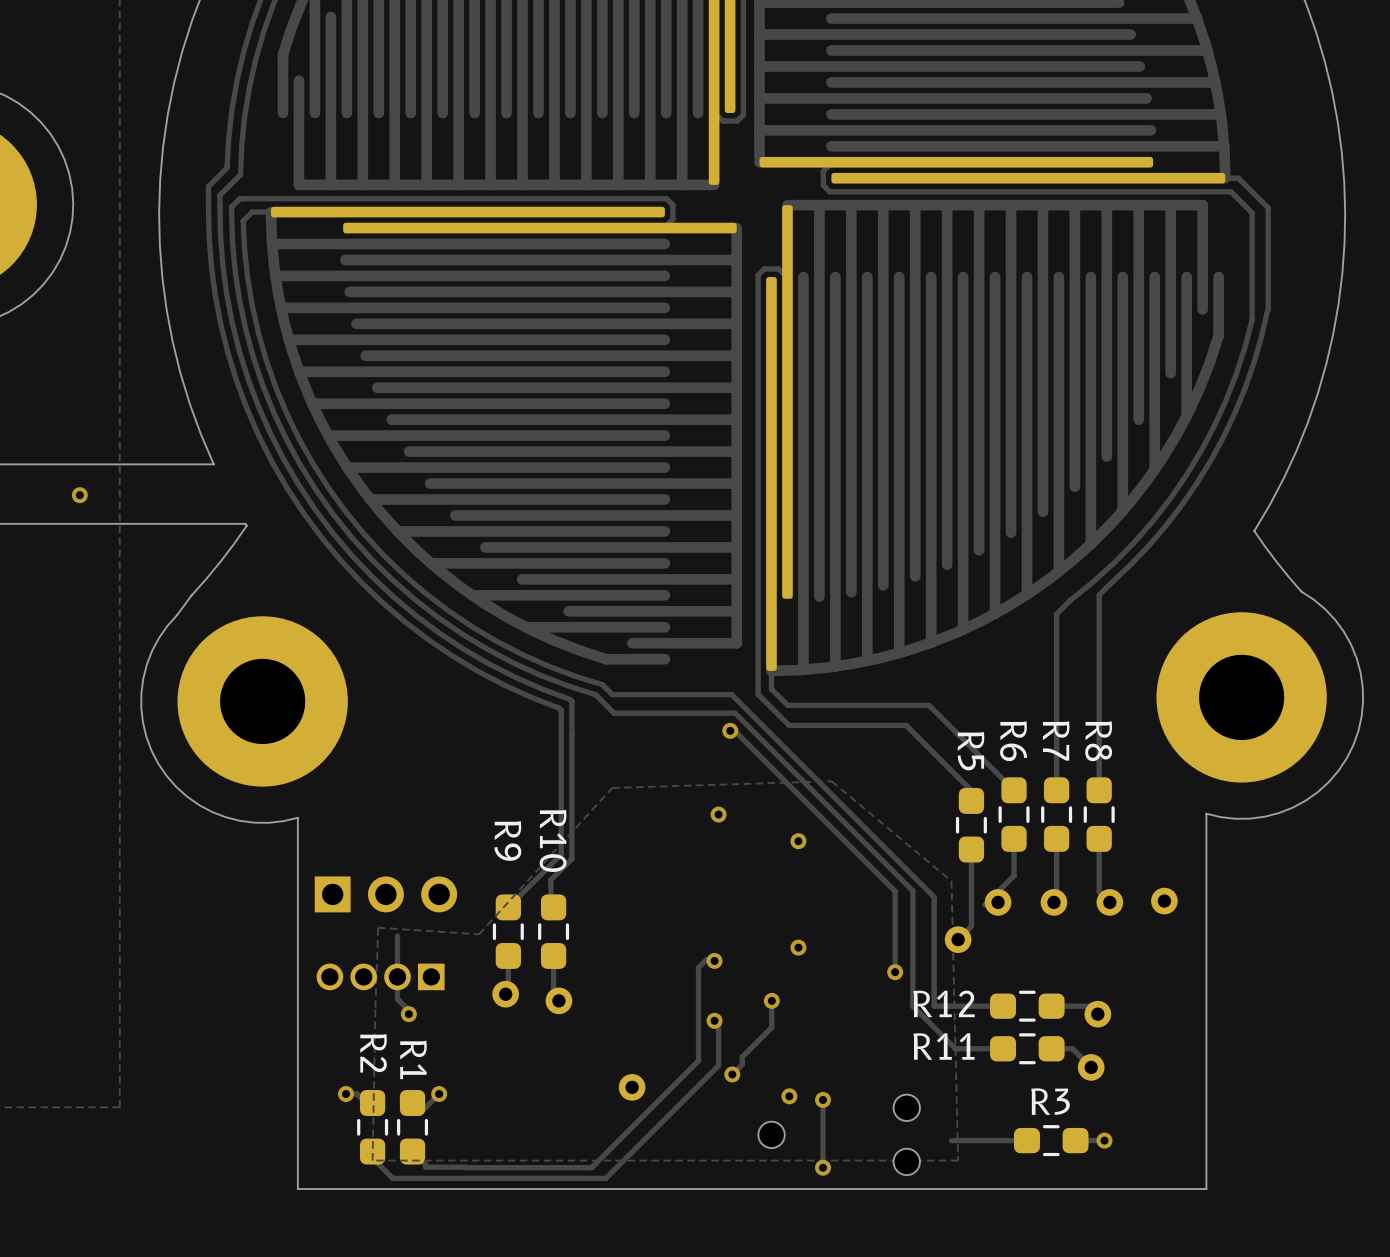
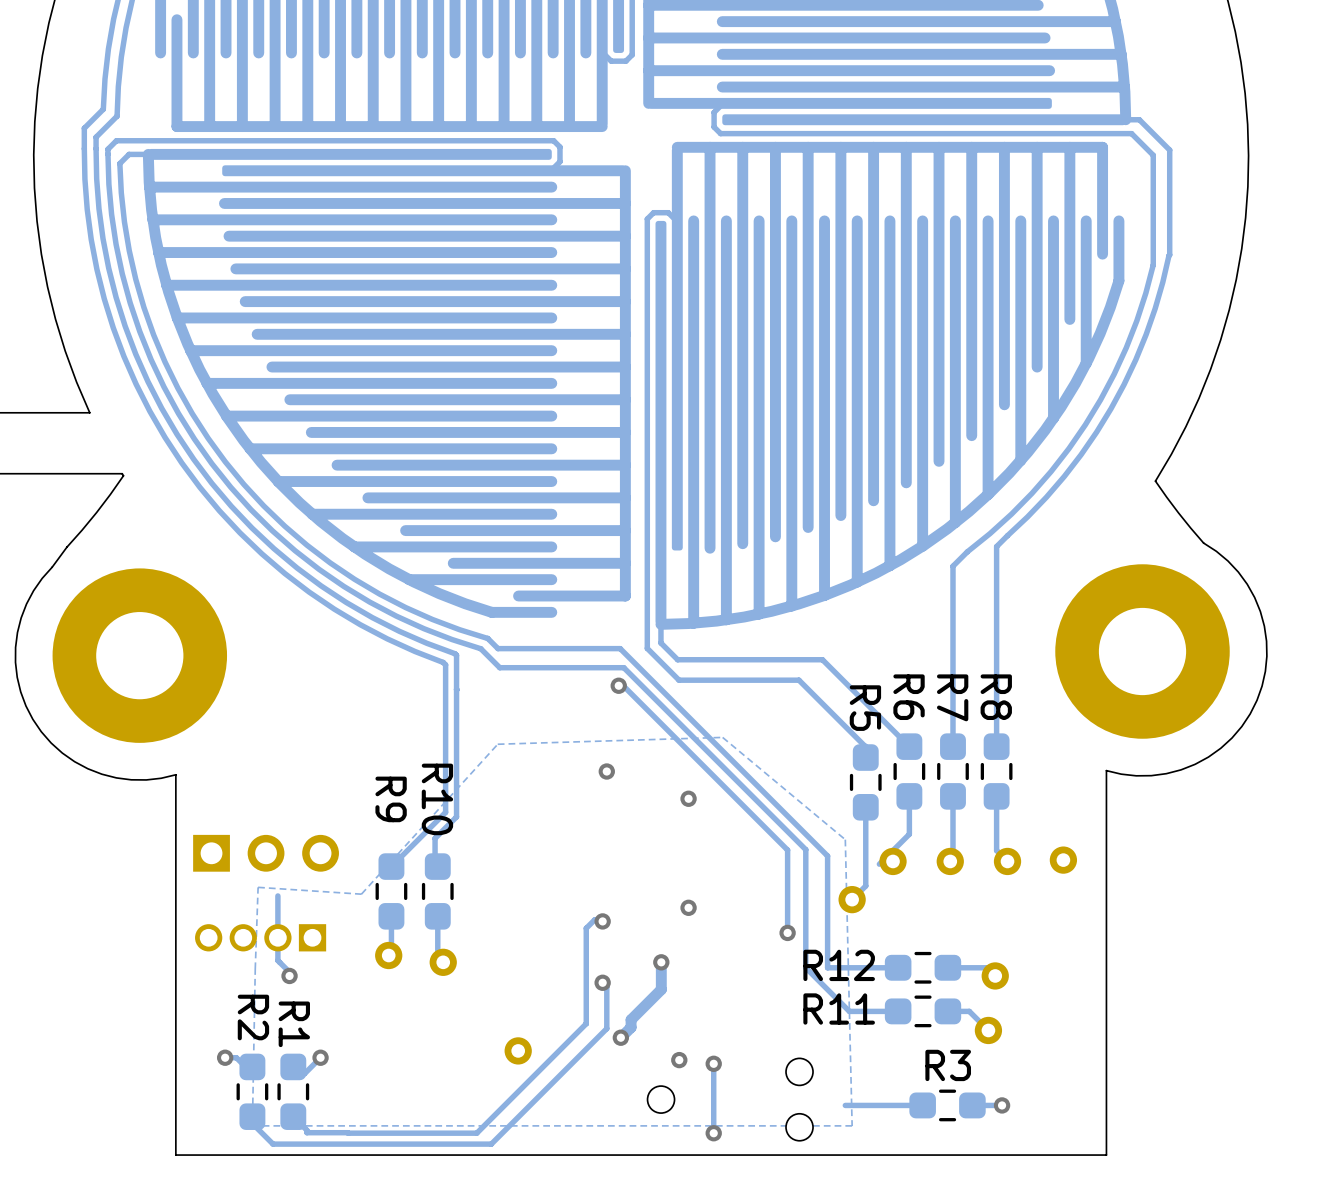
track width: thin (771, 1000) (771, 1027) (742, 1057) (742, 1064) (732, 1074) -> thick (661, 962) (661, 989) (631, 1019) (631, 1027) (620, 1037)

